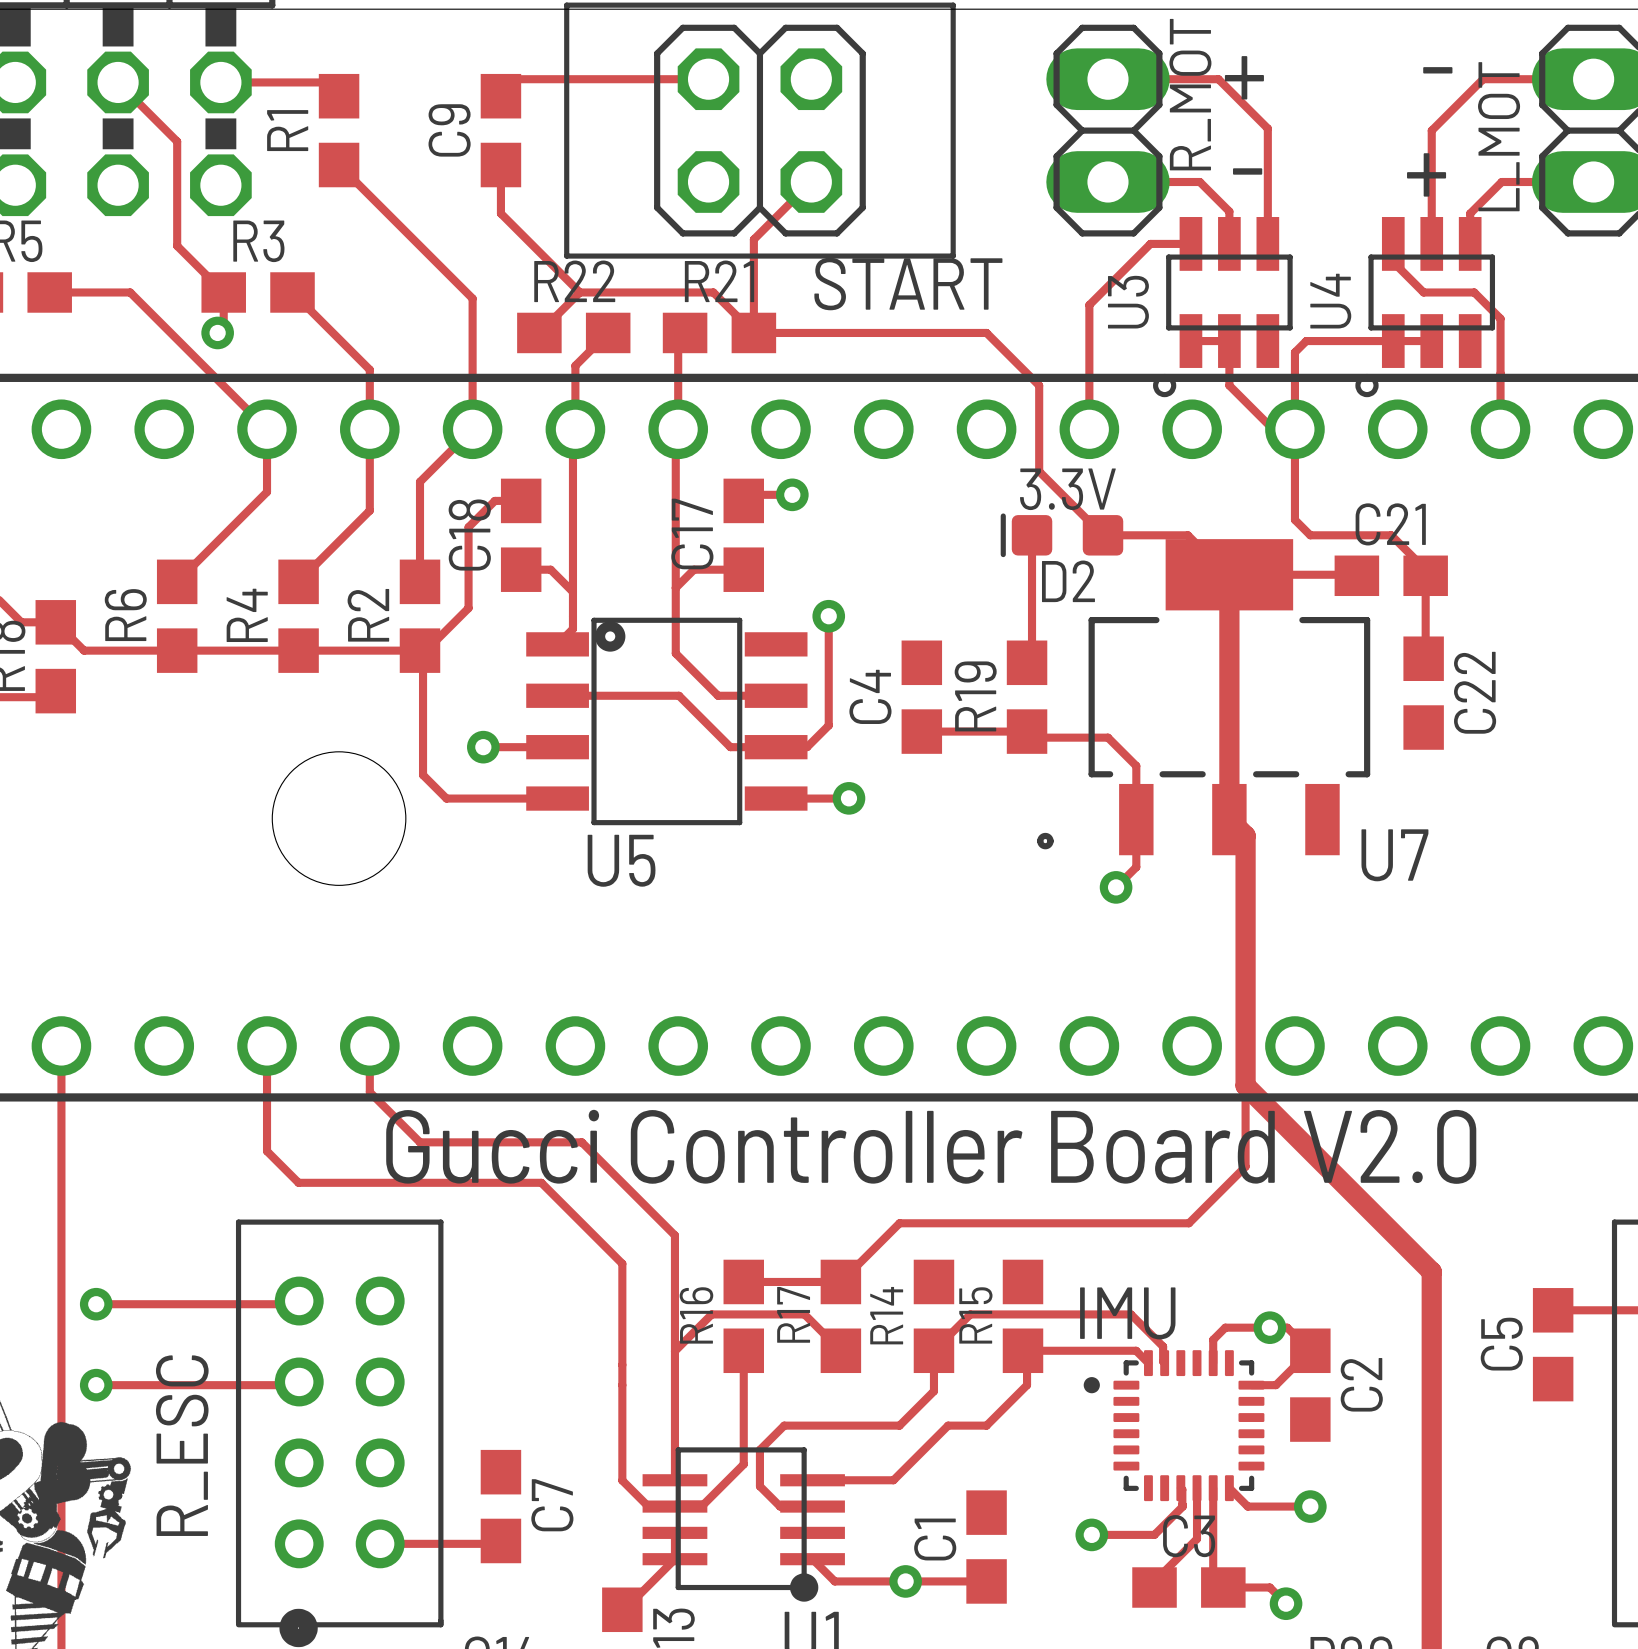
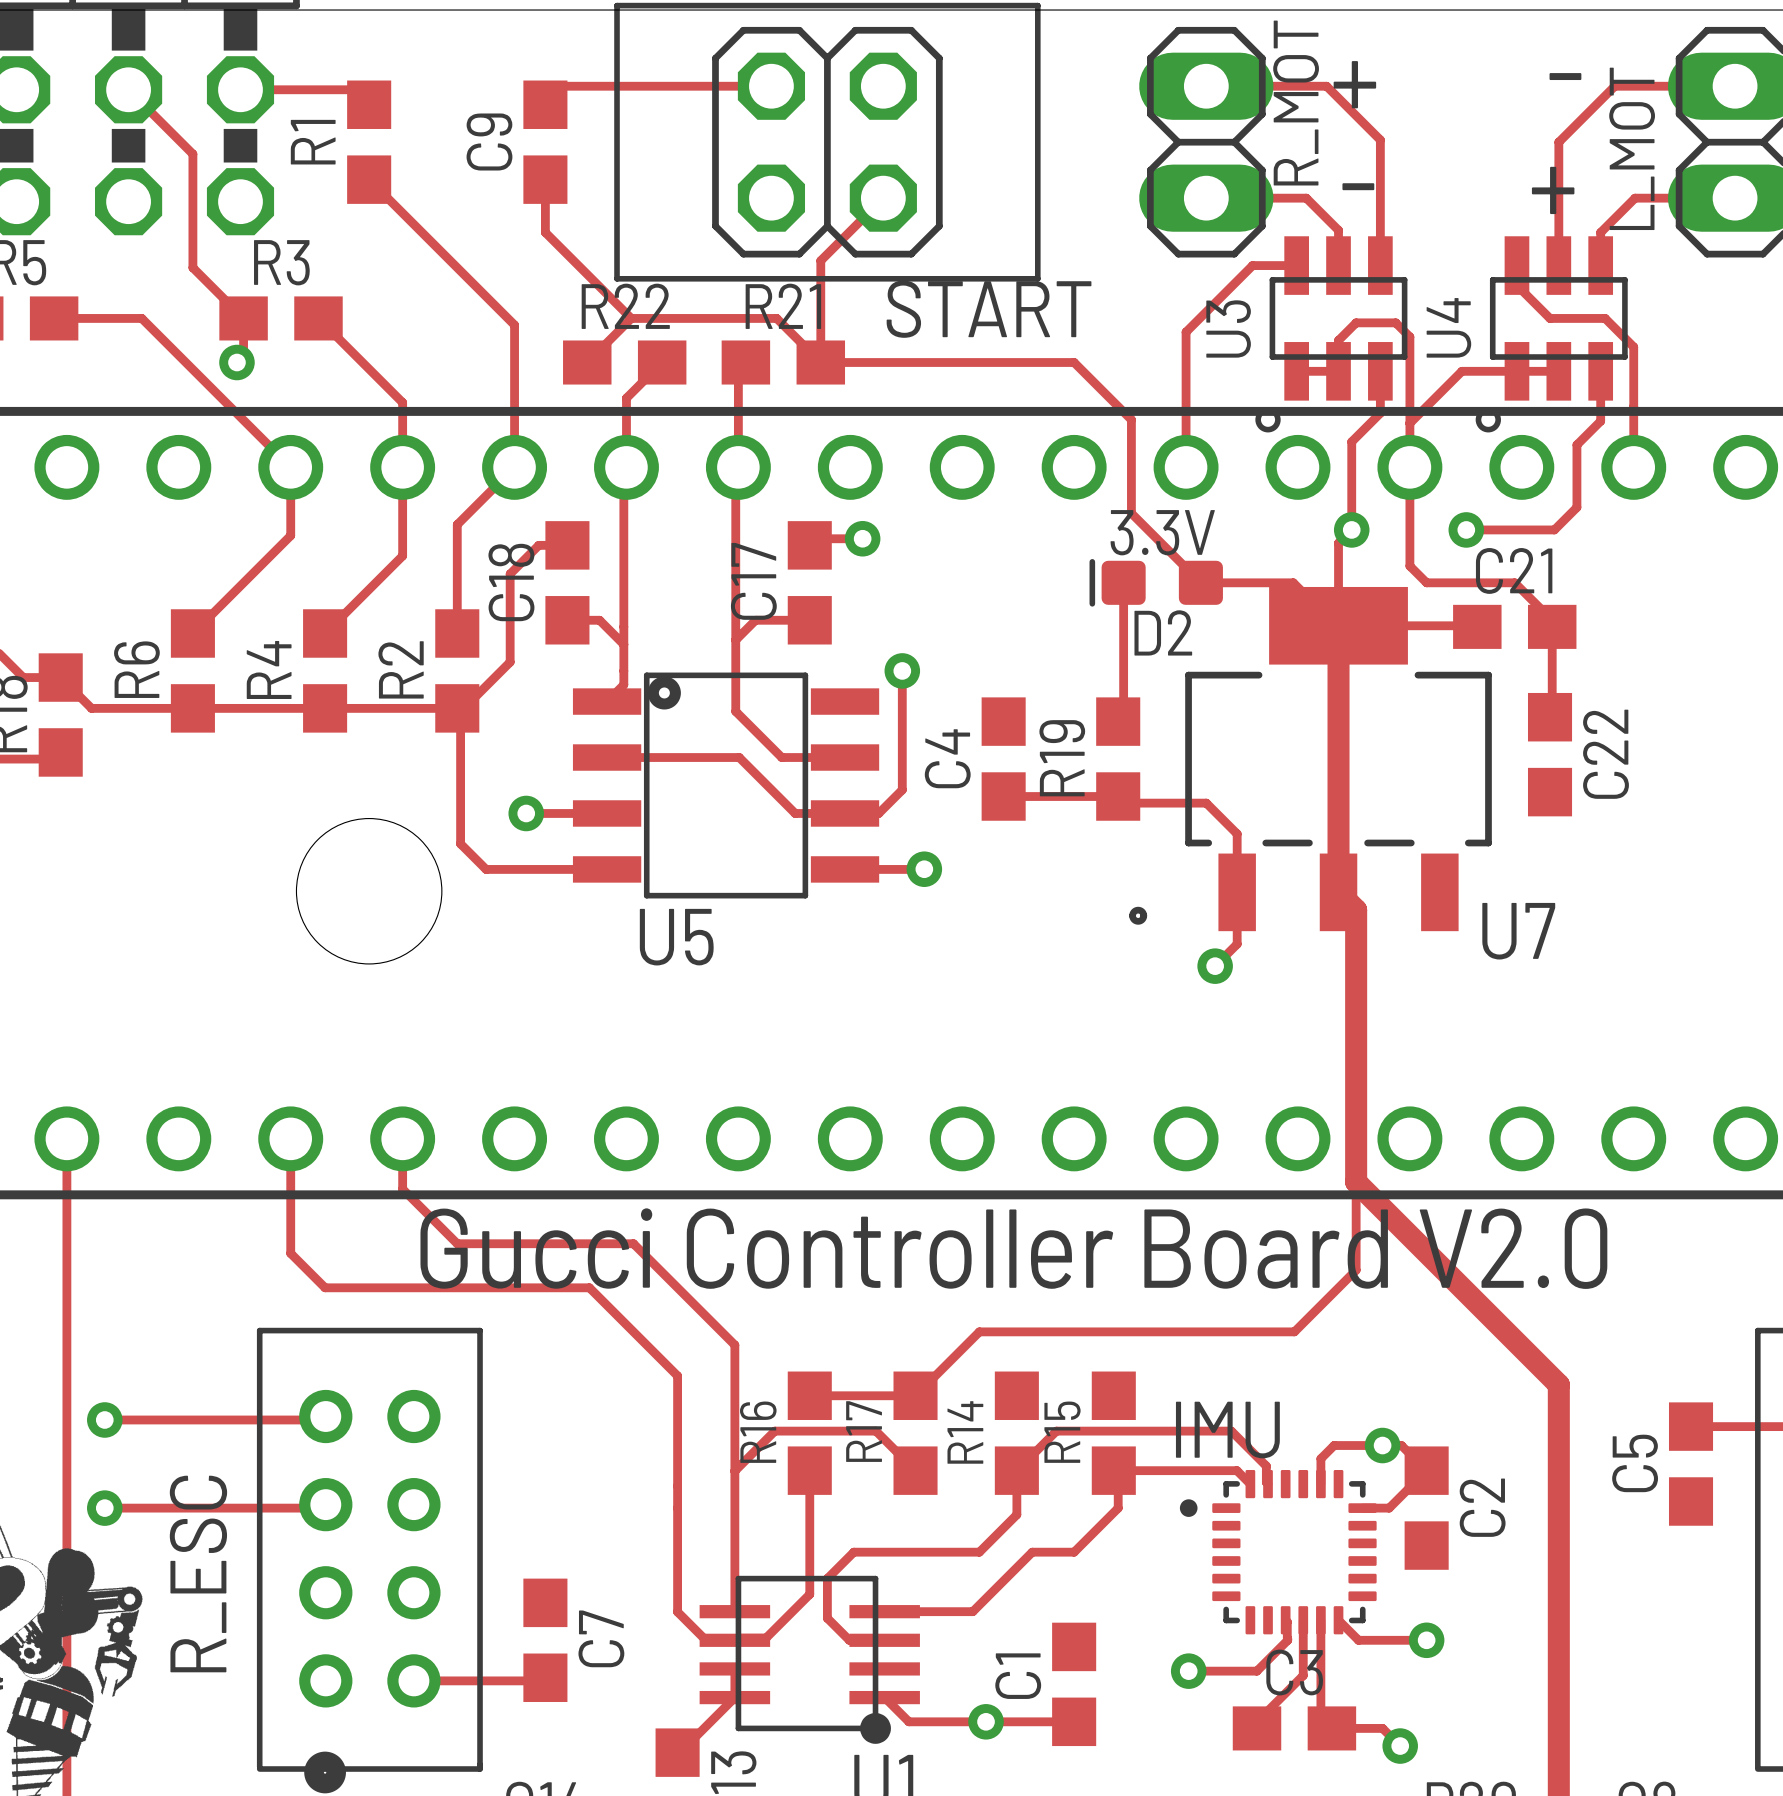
track: (1229, 341) (1229, 385) (1273, 429) (1294, 429) -> (1338, 371) (1338, 340) (1356, 322) (1395, 322) (1409, 336) (1409, 383)
track: none -> (1380, 371) (1380, 413) (1351, 441) (1351, 529) (1338, 543) (1338, 625)
track: (1342, 341) (1306, 341) (1294, 352) -> (1461, 371) (1409, 423)
track: none -> (1600, 371) (1600, 421) (1576, 444) (1576, 507) (1554, 529) (1466, 529)
via: none -> (1351, 529)
via: none -> (1466, 529)

